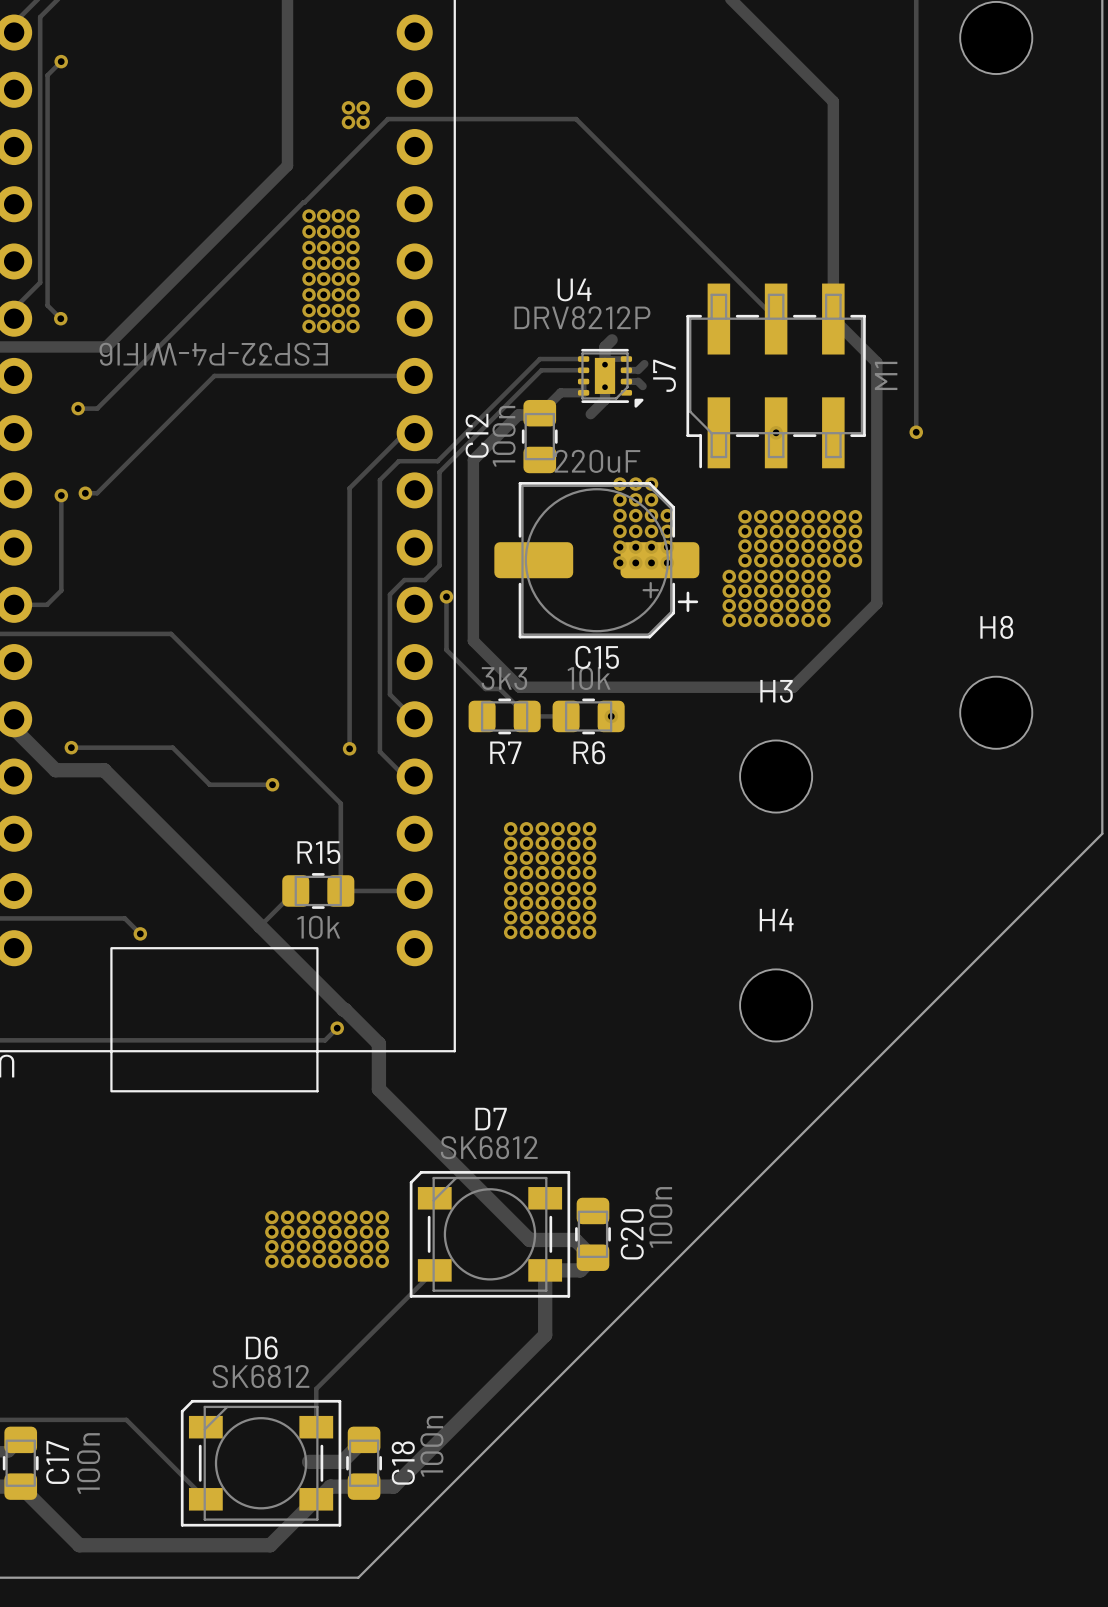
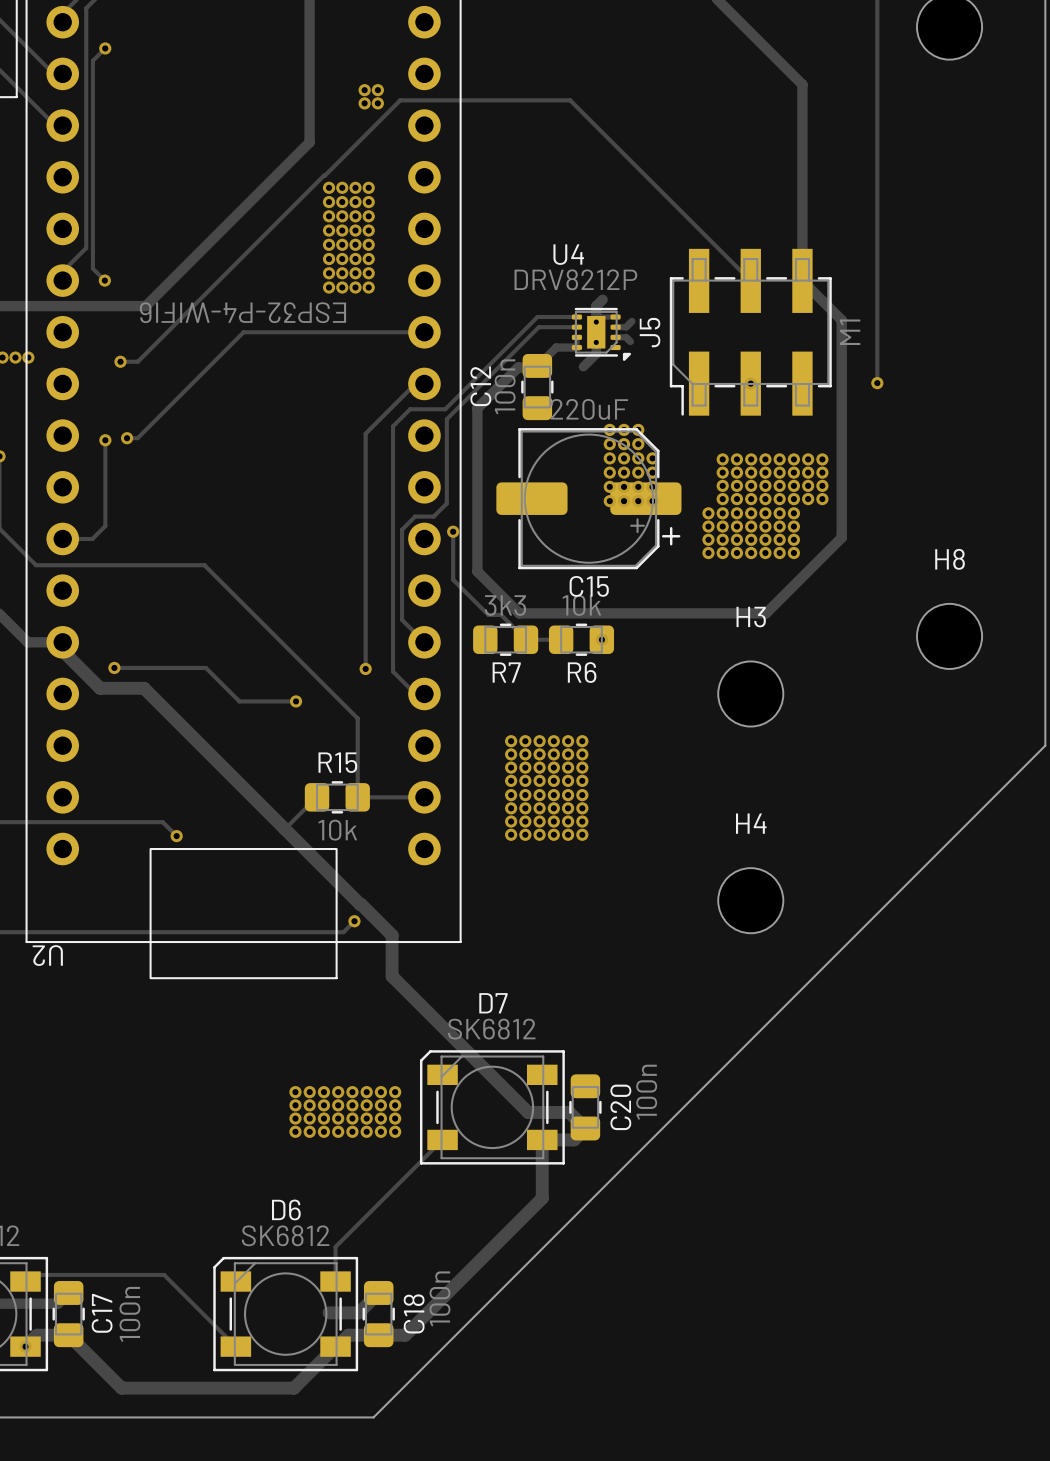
J7 name: J7 (664, 375) -> J5 (650, 332)

